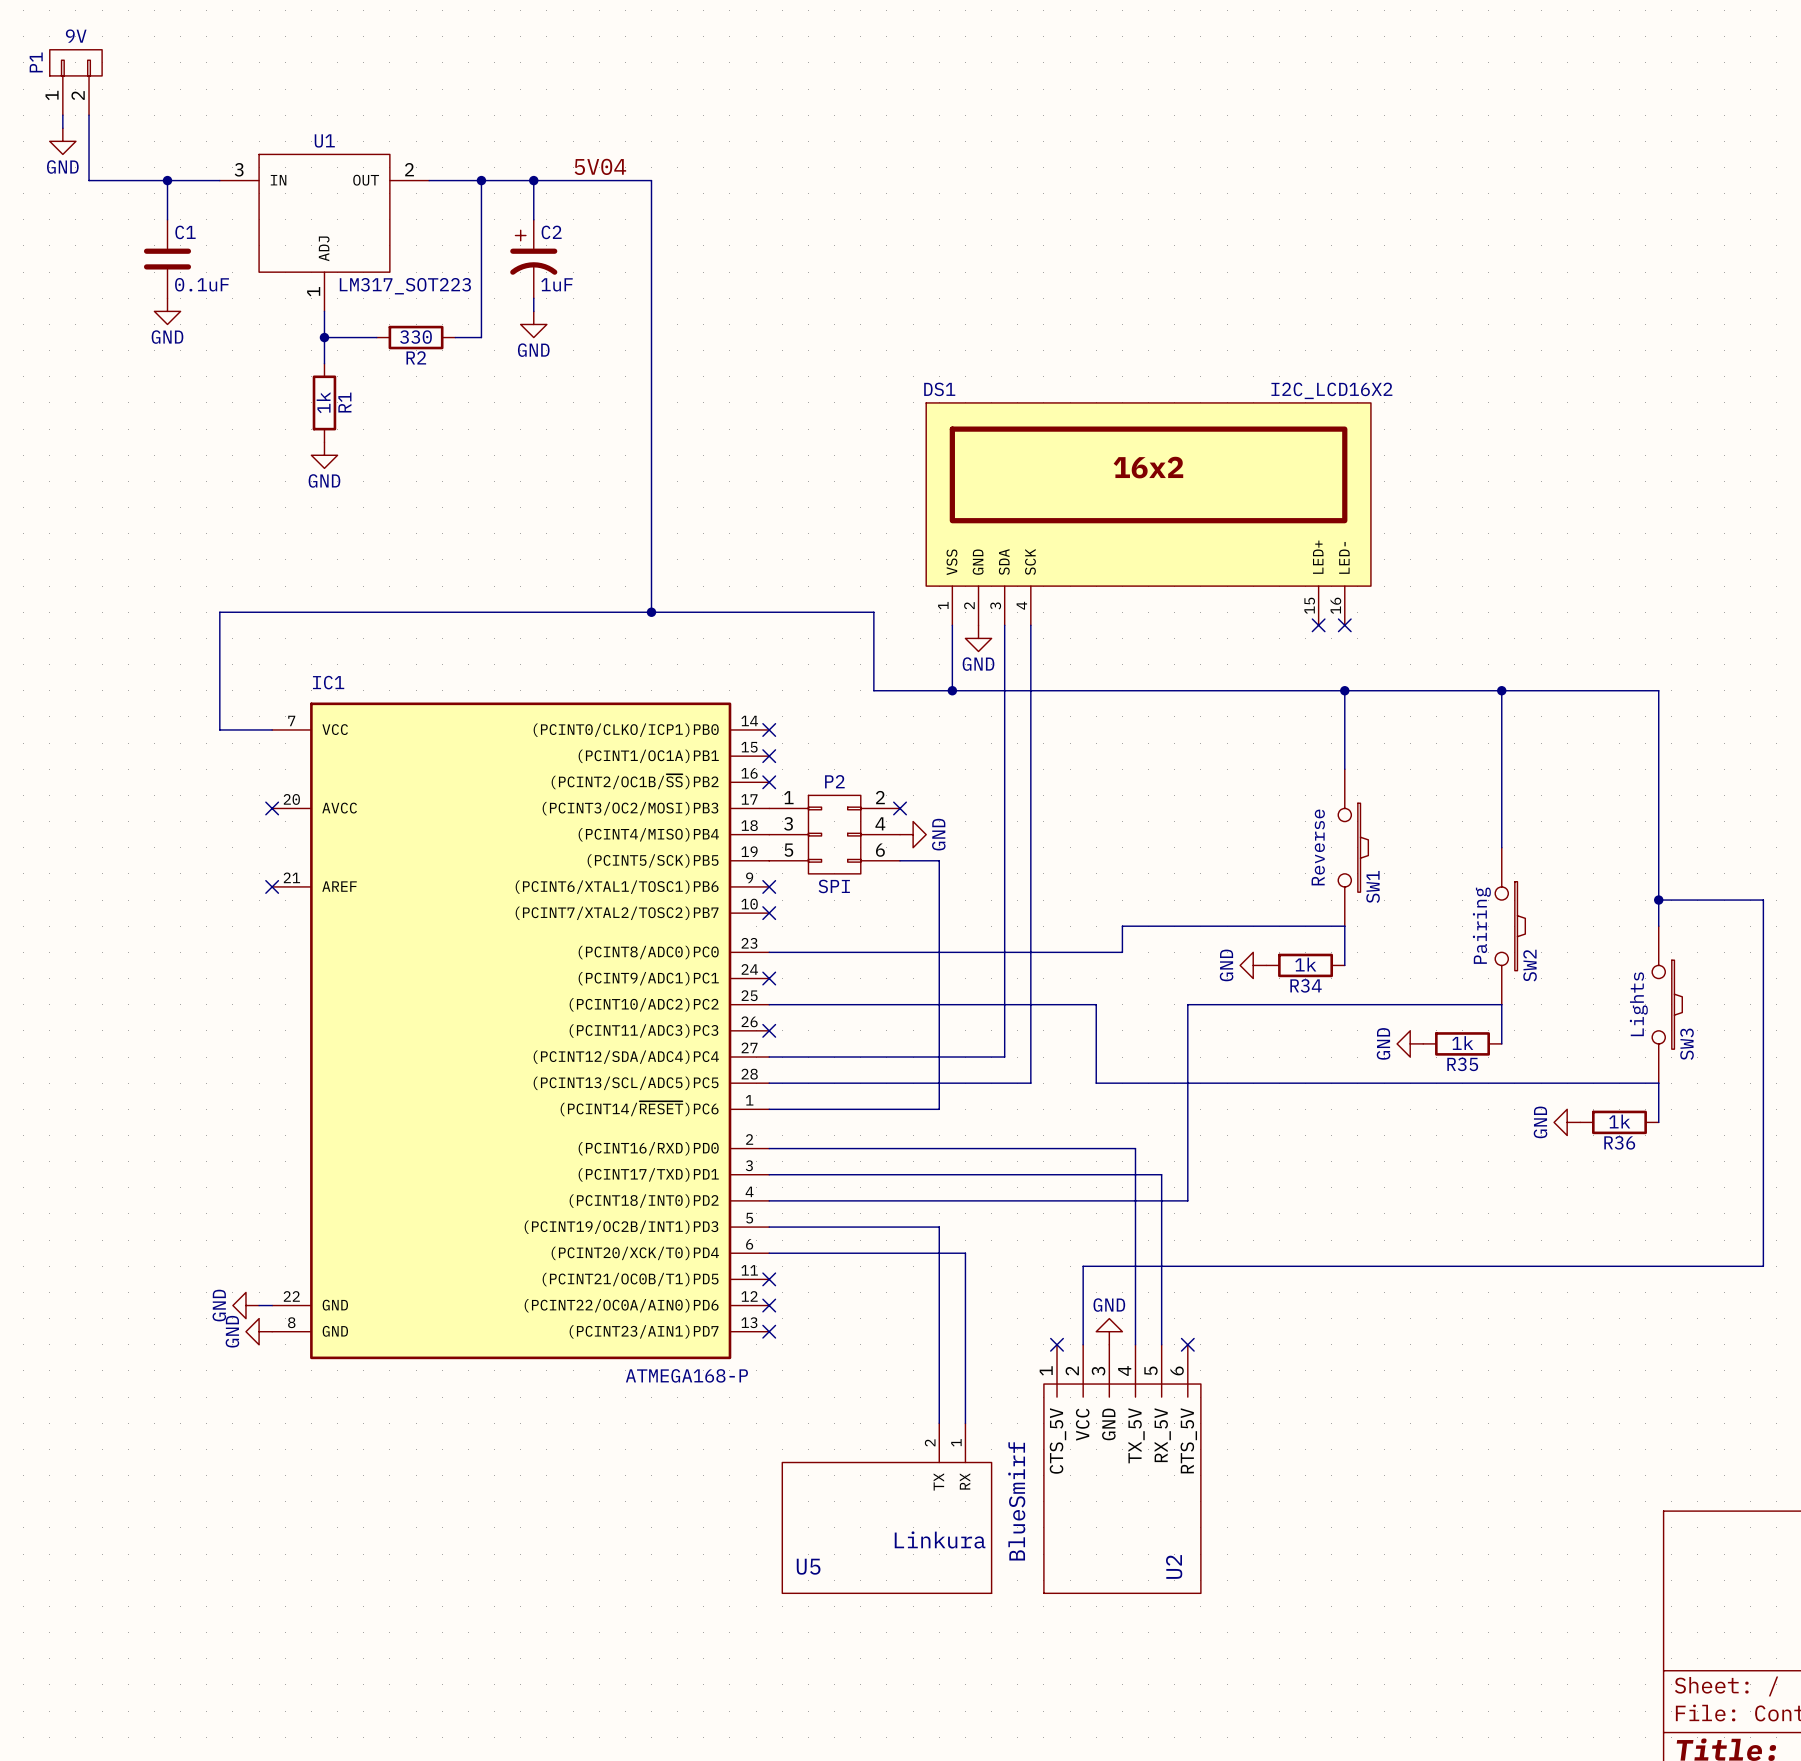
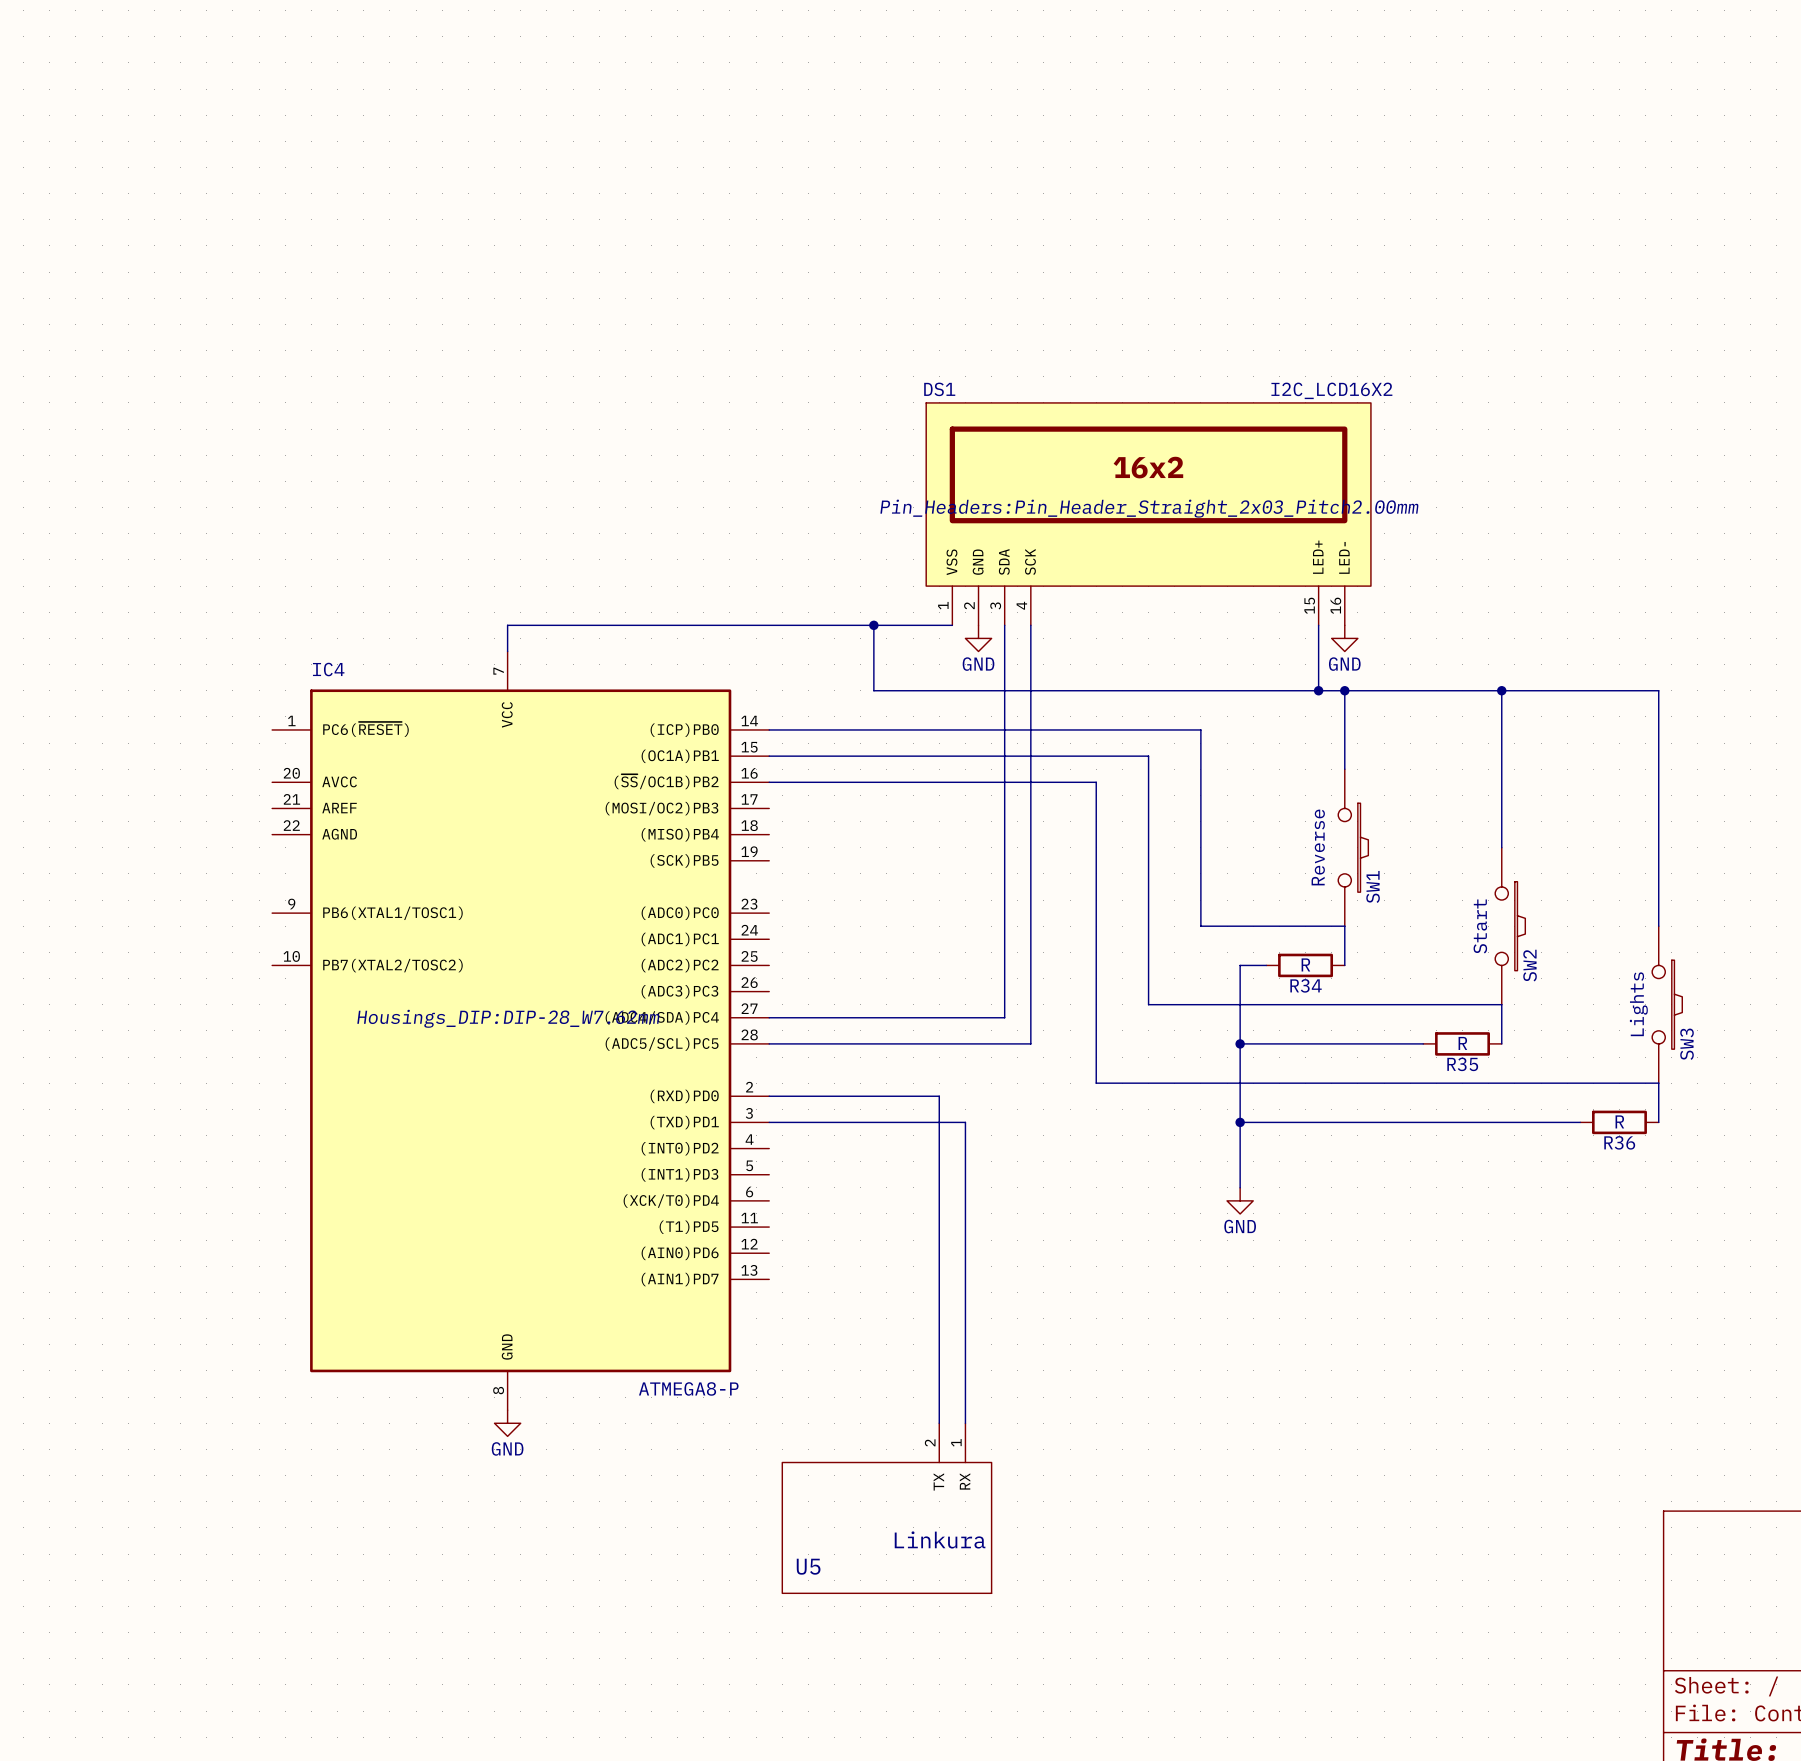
P1: 9V (75, 82) -> none
wire: (62, 115) (62, 128) -> none
wire: (89, 115) (89, 180) (219, 180) -> none
power symbol: GND (62, 141) -> none
label: 5V04 (600, 166) -> none
wire: (167, 180) (167, 219) -> none
junction: (167, 180) -> none
wire: (429, 180) (651, 180) (651, 612) -> none
wire: (481, 180) (481, 337) (455, 337) -> none
junction: (481, 180) -> none
wire: (533, 180) (533, 219) -> none
junction: (533, 180) -> none
U1: LM317_SOT223 (324, 232) -> none
C1: 0.1uF (167, 259) -> none
C2: 1uF (533, 259) -> none
wire: (533, 298) (533, 311) -> none
power symbol: GND (167, 311) -> none
wire: (324, 311) (324, 363) -> none
power symbol: GND (533, 324) -> none
wire: (324, 337) (376, 337) -> none
junction: (324, 337) -> none
R2: 330 (416, 337) -> none
R1: 1k (324, 402) -> none
power symbol: GND (324, 455) -> none
DS1 text: none -> Pin_Headers:Pin_Header_Straight_2x03_Pitch2.00mm (1149, 508)
junction: (651, 612) -> none
wire: (873, 625) (873, 612) (219, 612) (219, 729) (272, 729) -> none
junction: none -> (873, 625)
wire: (952, 625) (952, 690) -> (952, 625) (507, 625) (507, 651)
wire: none -> (1318, 625) (1318, 690)
no-connect mark: (1318, 625) -> none
no-connect mark: (1344, 625) -> none
power symbol: none -> GND (1344, 638)
junction: (952, 690) -> none
junction: none -> (1318, 690)
no-connect mark: (769, 729) -> none
no-connect mark: (769, 756) -> none
no-connect mark: (769, 782) -> none
no-connect mark: (272, 808) -> none
no-connect mark: (900, 808) -> none
P2: SPI (834, 834) -> none
power symbol: GND (913, 834) -> none
wire: (900, 860) (939, 860) (939, 1096) -> (769, 1096) (939, 1096)
no-connect mark: (272, 886) -> none
no-connect mark: (769, 886) -> none
wire: (1658, 900) (1763, 900) (1763, 1266) (1083, 1266) (1083, 1344) -> none
junction: (1658, 900) -> none
no-connect mark: (769, 913) -> none
SW2 value: Pairing (1481, 925) -> Start (1480, 926)
wire: (1200, 926) (1122, 926) (1122, 952) (769, 952) -> (1200, 926) (1200, 729) (769, 729)
R34 value: 1k (1305, 964) -> R (1305, 964)
power symbol: GND (1253, 965) -> none
wire: none -> (1266, 965) (1240, 965) (1240, 1187)
no-connect mark: (769, 978) -> none
wire: (769, 1004) (1096, 1004) -> (769, 782) (1096, 782) (1096, 1004)
wire: (1187, 1004) (1187, 1200) (769, 1200) -> (1187, 1004) (1148, 1004) (1148, 756) (769, 756)
wire: (1004, 1017) (1004, 1057) (769, 1057) -> (1004, 1017) (769, 1017)
IC1: ATMEGA168-P (520, 1030) -> none
IC4: none -> ATMEGA8-P (520, 1030)
no-connect mark: (769, 1030) -> none
wire: (1030, 1043) (1030, 1083) (769, 1083) -> (1030, 1043) (769, 1043)
wire: none -> (1240, 1043) (1423, 1043)
junction: none -> (1240, 1043)
power symbol: GND (1410, 1043) -> none
R35 value: 1k (1462, 1043) -> R (1462, 1043)
wire: (769, 1109) (939, 1109) -> (939, 1227) (939, 1109)
R36 value: 1k (1619, 1121) -> R (1619, 1121)
wire: none -> (1240, 1122) (1580, 1122)
junction: none -> (1240, 1122)
power symbol: GND (1567, 1122) -> none
wire: (769, 1148) (1135, 1148) (1135, 1344) -> none
wire: (769, 1174) (1161, 1174) (1161, 1344) -> none
power symbol: none -> GND (1240, 1200)
wire: (769, 1227) (939, 1227) -> none
wire: (769, 1253) (965, 1253) -> (769, 1122) (965, 1122) (965, 1253)
no-connect mark: (769, 1279) -> none
power symbol: GND (245, 1305) -> none
wire: (259, 1305) (272, 1305) -> none
no-connect mark: (769, 1305) -> none
power symbol: GND (259, 1331) -> none
no-connect mark: (769, 1331) -> none
power symbol: GND (1109, 1331) -> none
no-connect mark: (1057, 1344) -> none
no-connect mark: (1187, 1344) -> none
power symbol: none -> GND (507, 1423)
U2: BlueSmirf (1122, 1469) -> none

